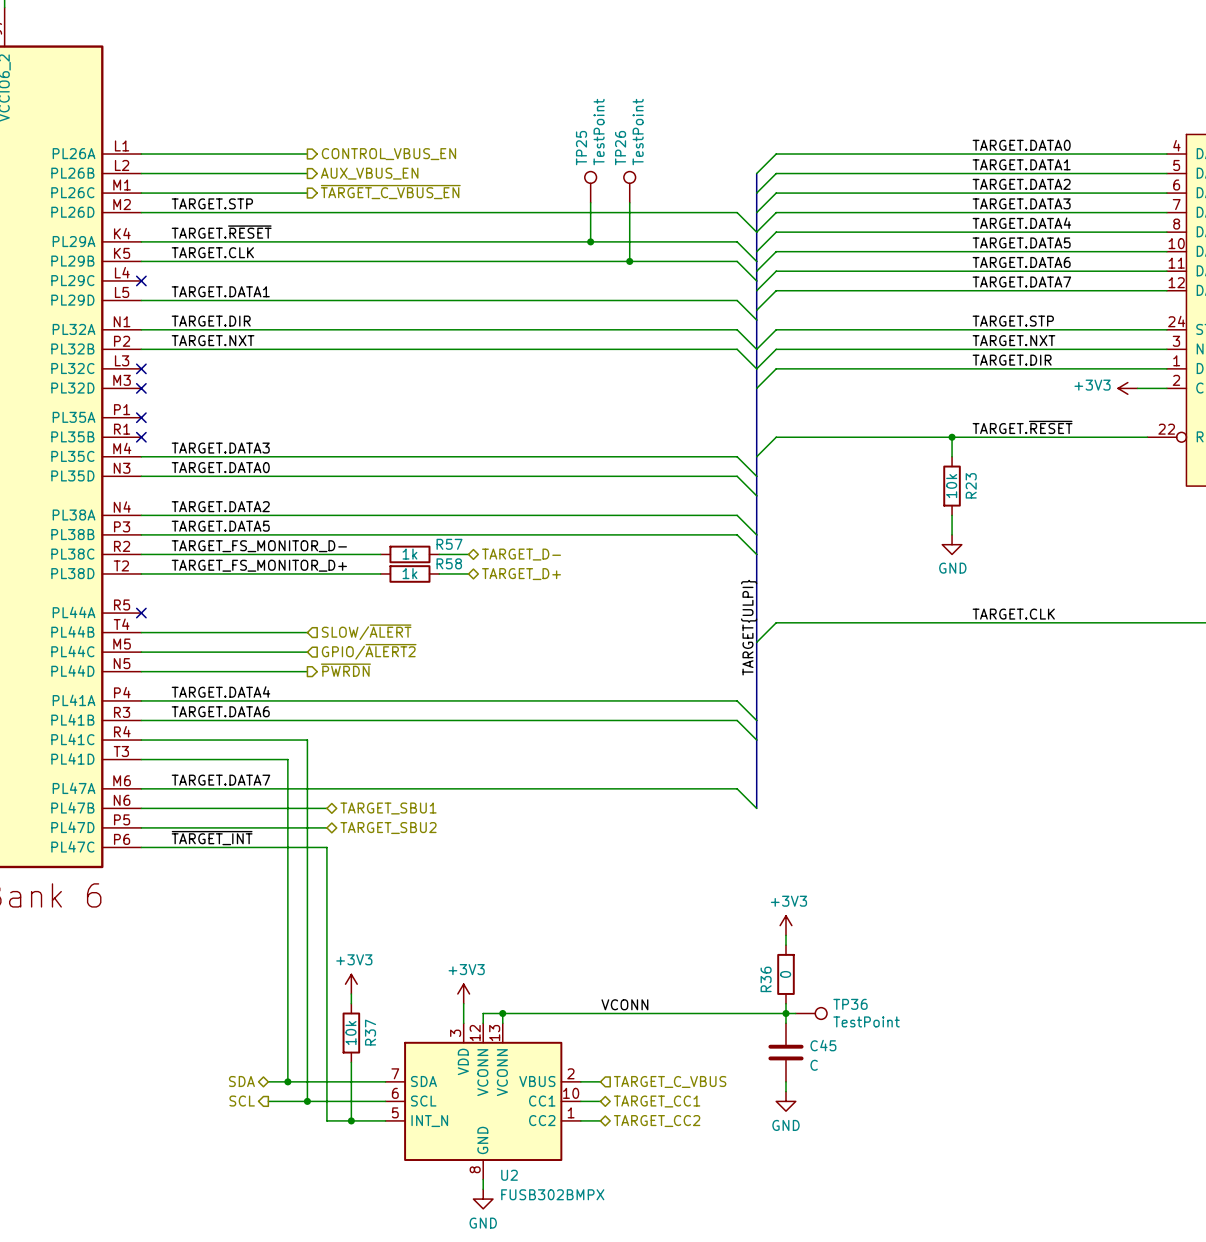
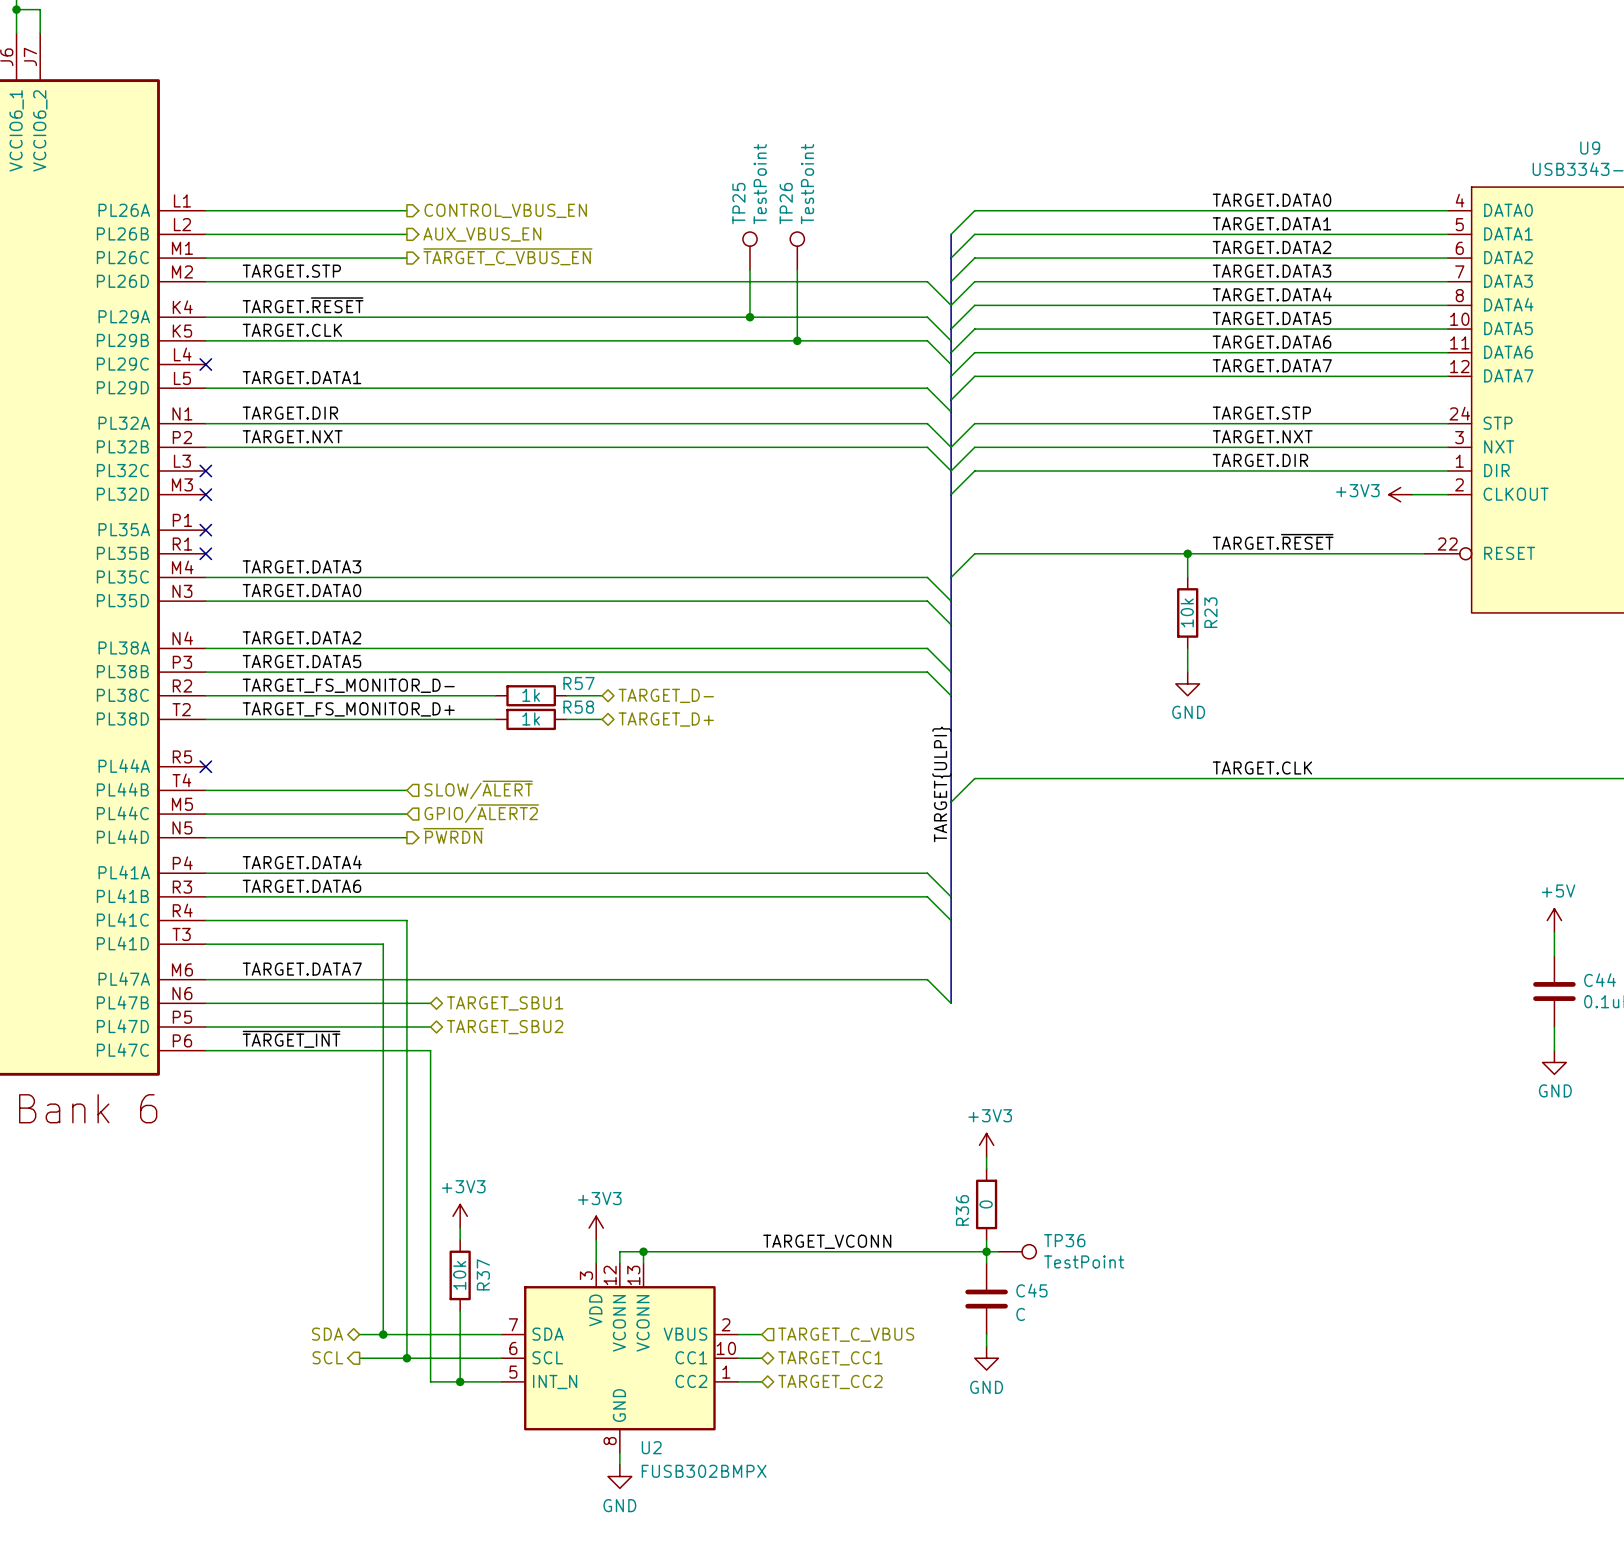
label: VCONN (624, 1004) -> TARGET_VCONN (827, 1241)

